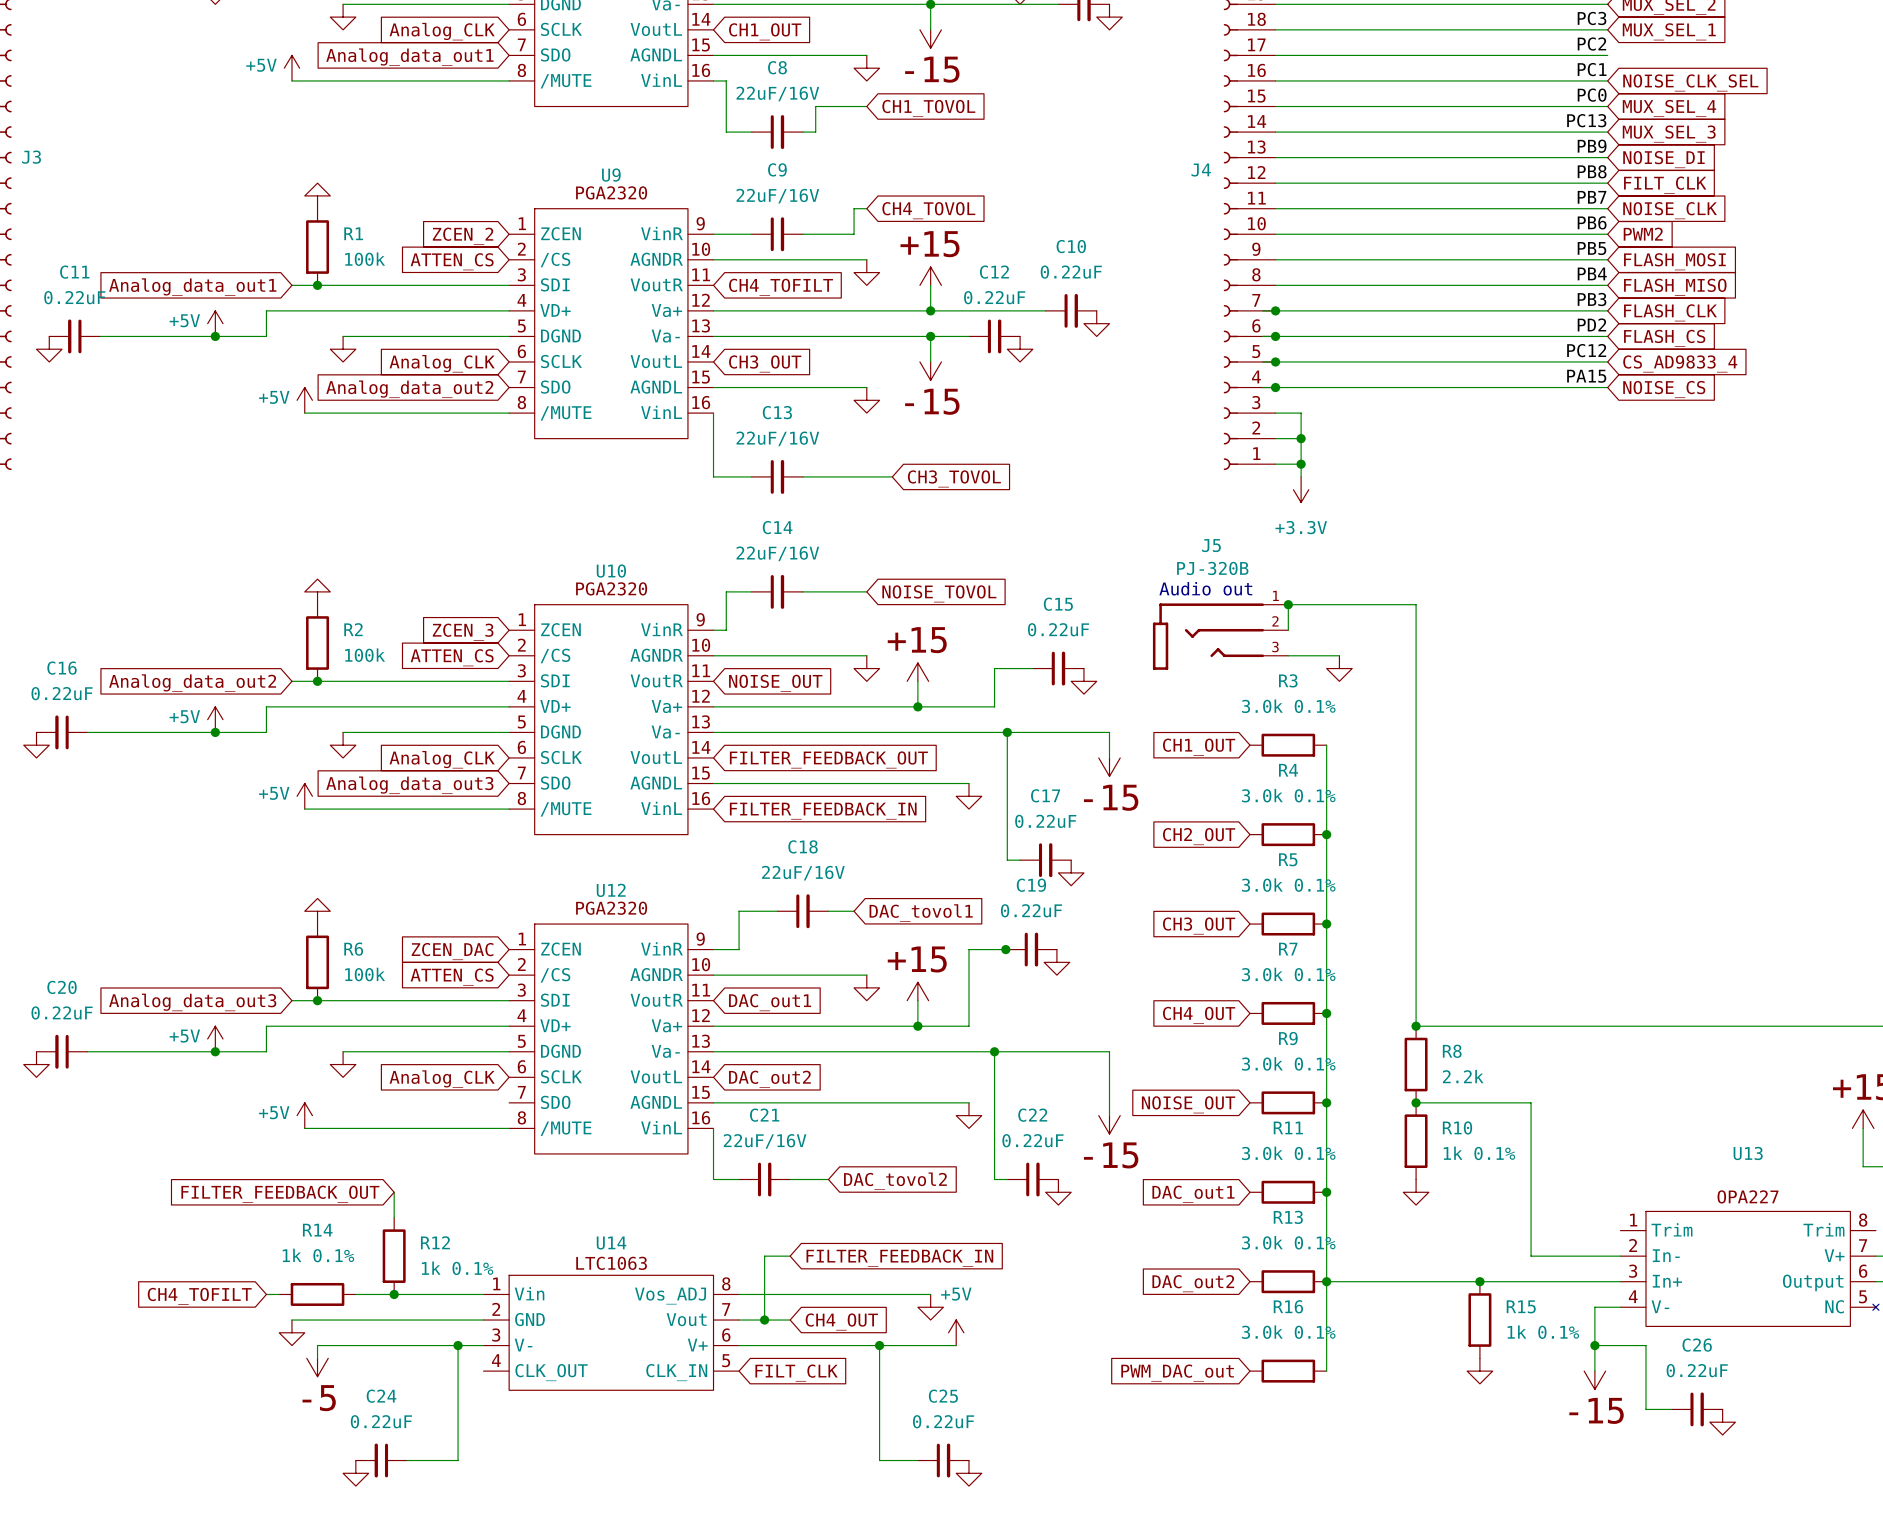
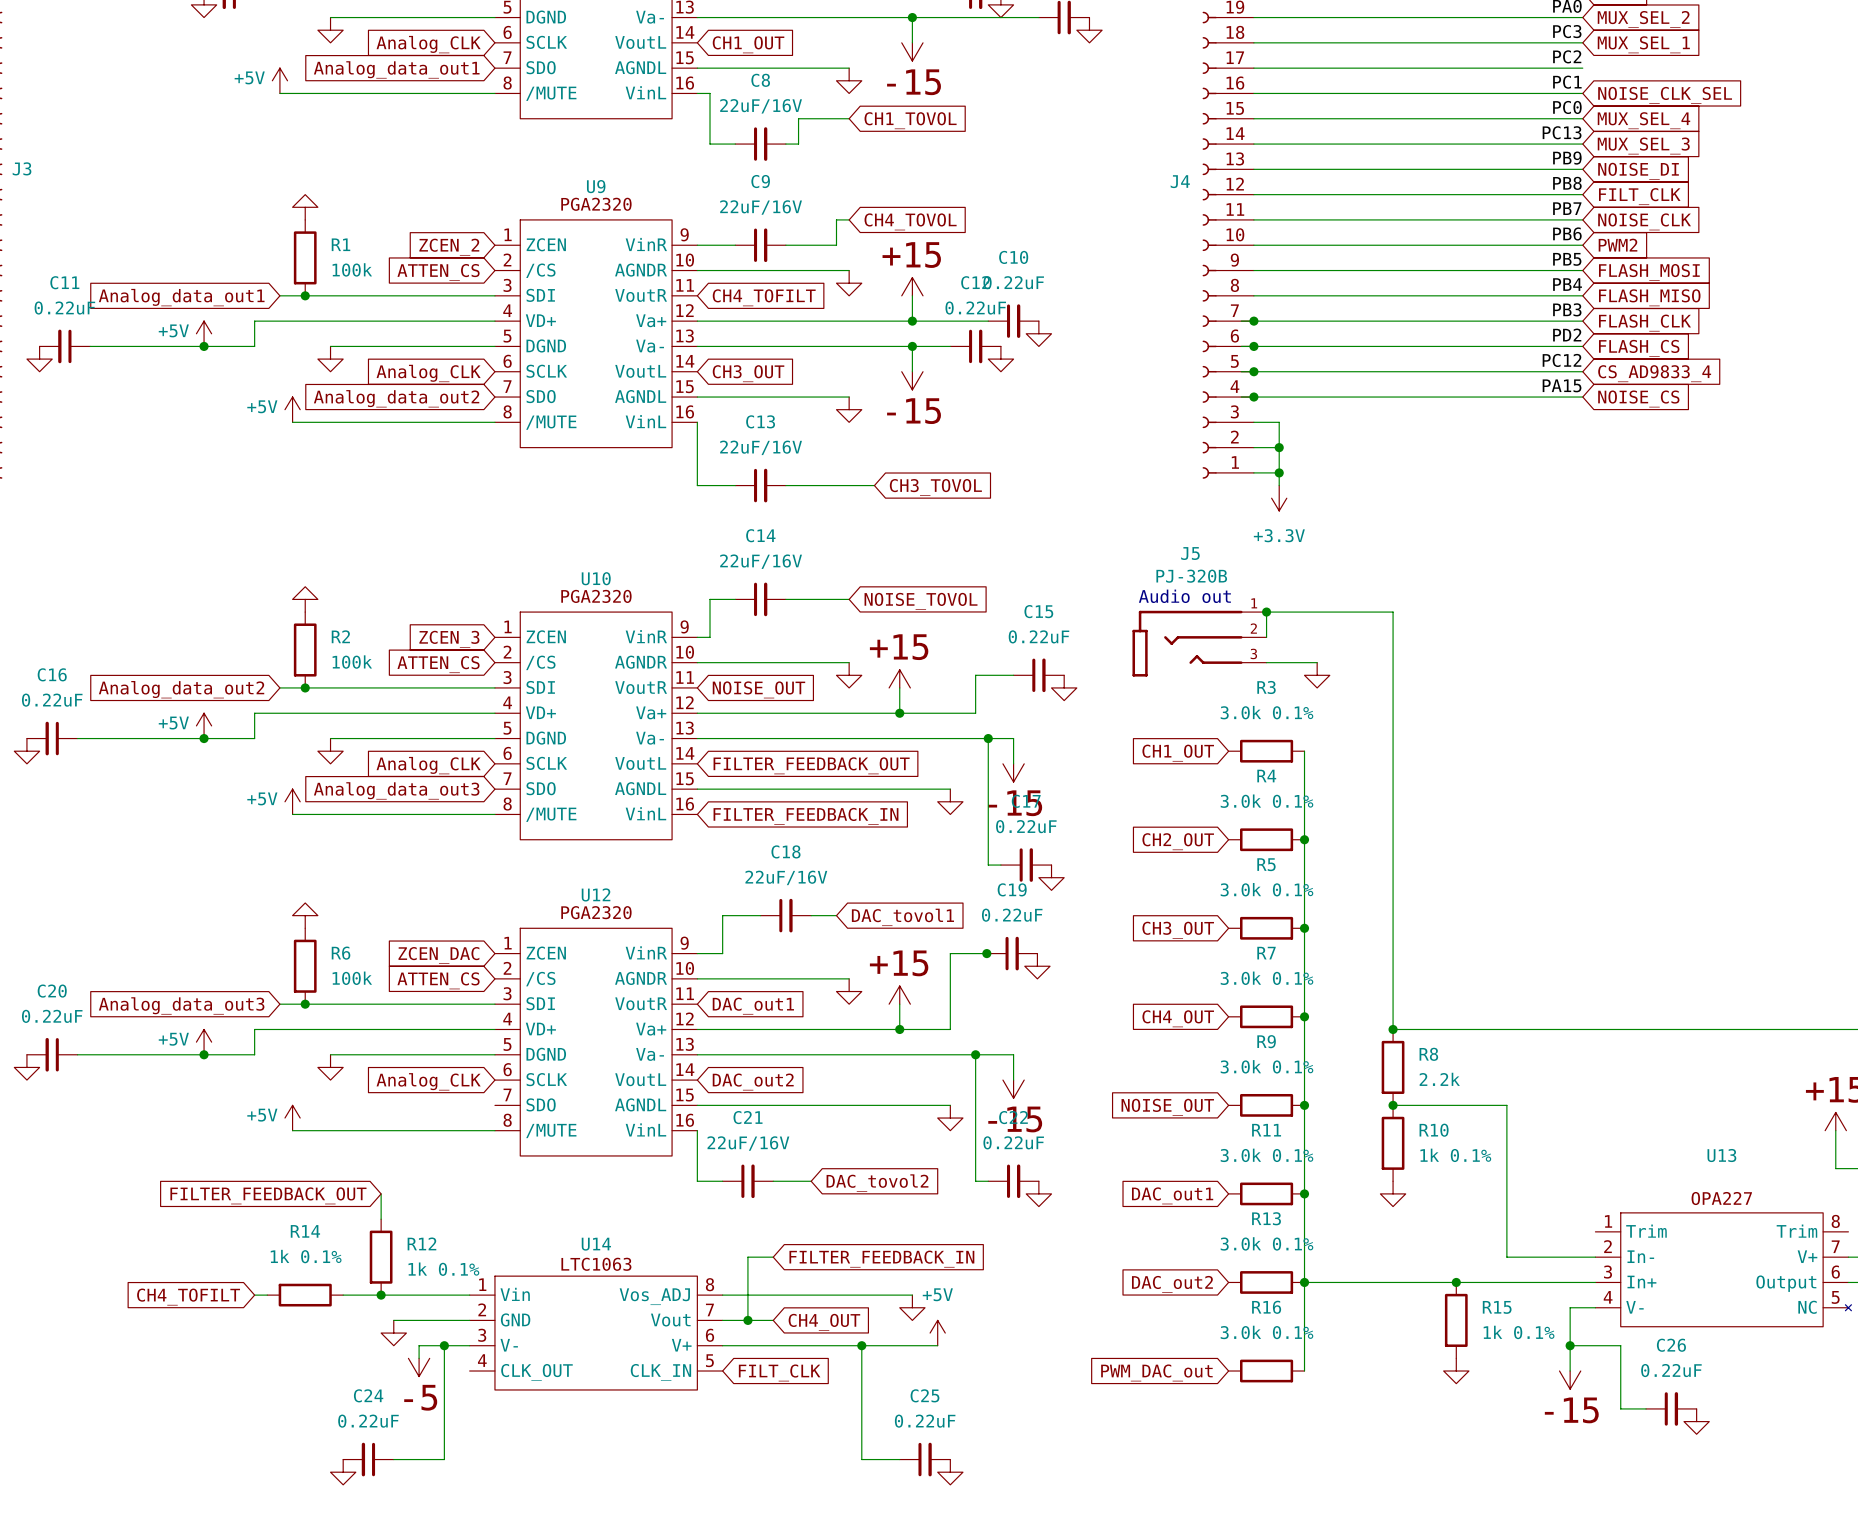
C10 position: (1071, 310) -> (1013, 321)
power symbol position: (1096, 323) -> (1038, 333)
wire: (1032, 732) (1109, 732) (1109, 757) -> (1013, 738) (1013, 763)
power symbol position: (1109, 767) -> (1013, 772)
wire: (1032, 1051) (1109, 1051) (1109, 1115) -> (1013, 1054) (1013, 1080)
power symbol position: (1109, 1124) -> (1013, 1089)
wire: (291, 1320) (406, 1320) -> none
power symbol position: (291, 1332) -> (393, 1333)
wire: (432, 1345) (317, 1345) (317, 1358) -> (419, 1345) (419, 1358)
power symbol position: (317, 1367) -> (419, 1367)

